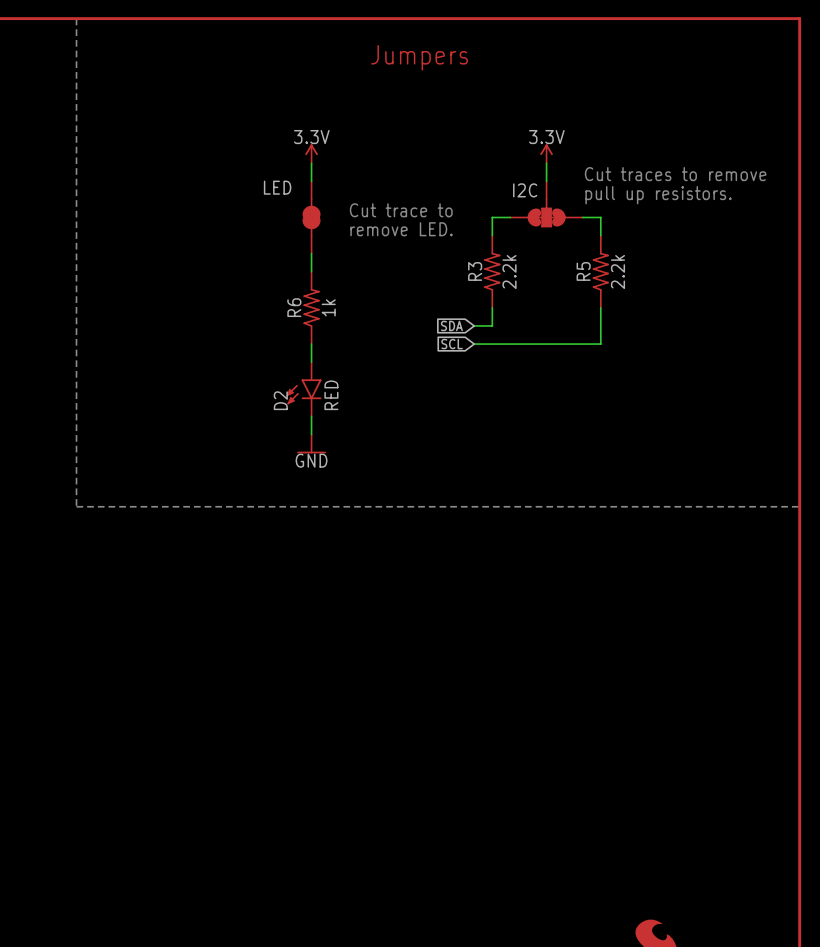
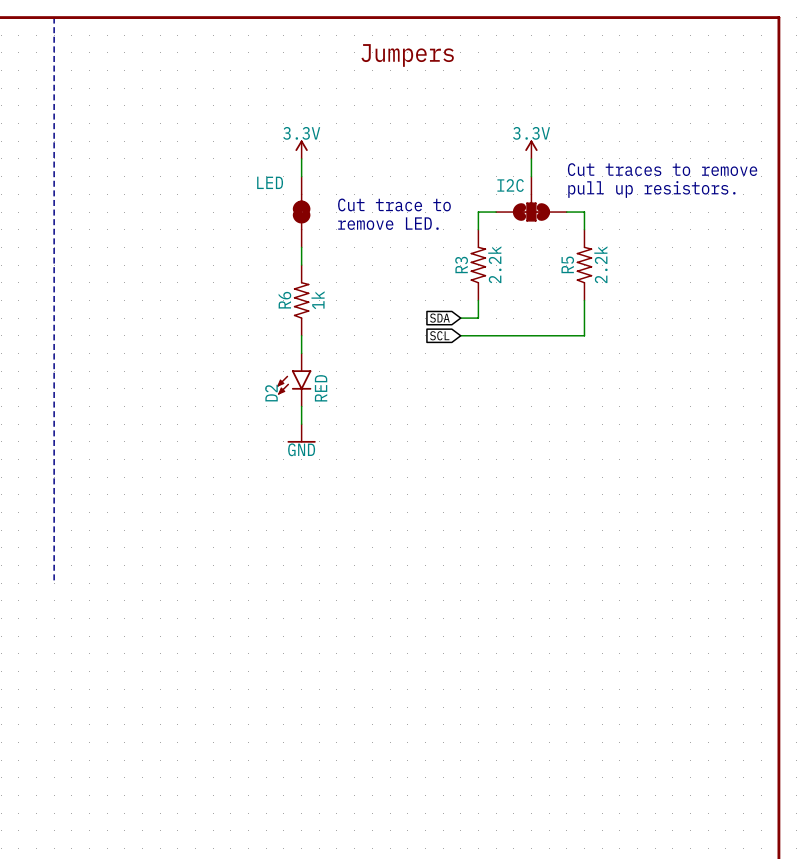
line: none -> (54, 17) (54, 583)
line: (76, 18) (76, 506) (799, 506) -> none

